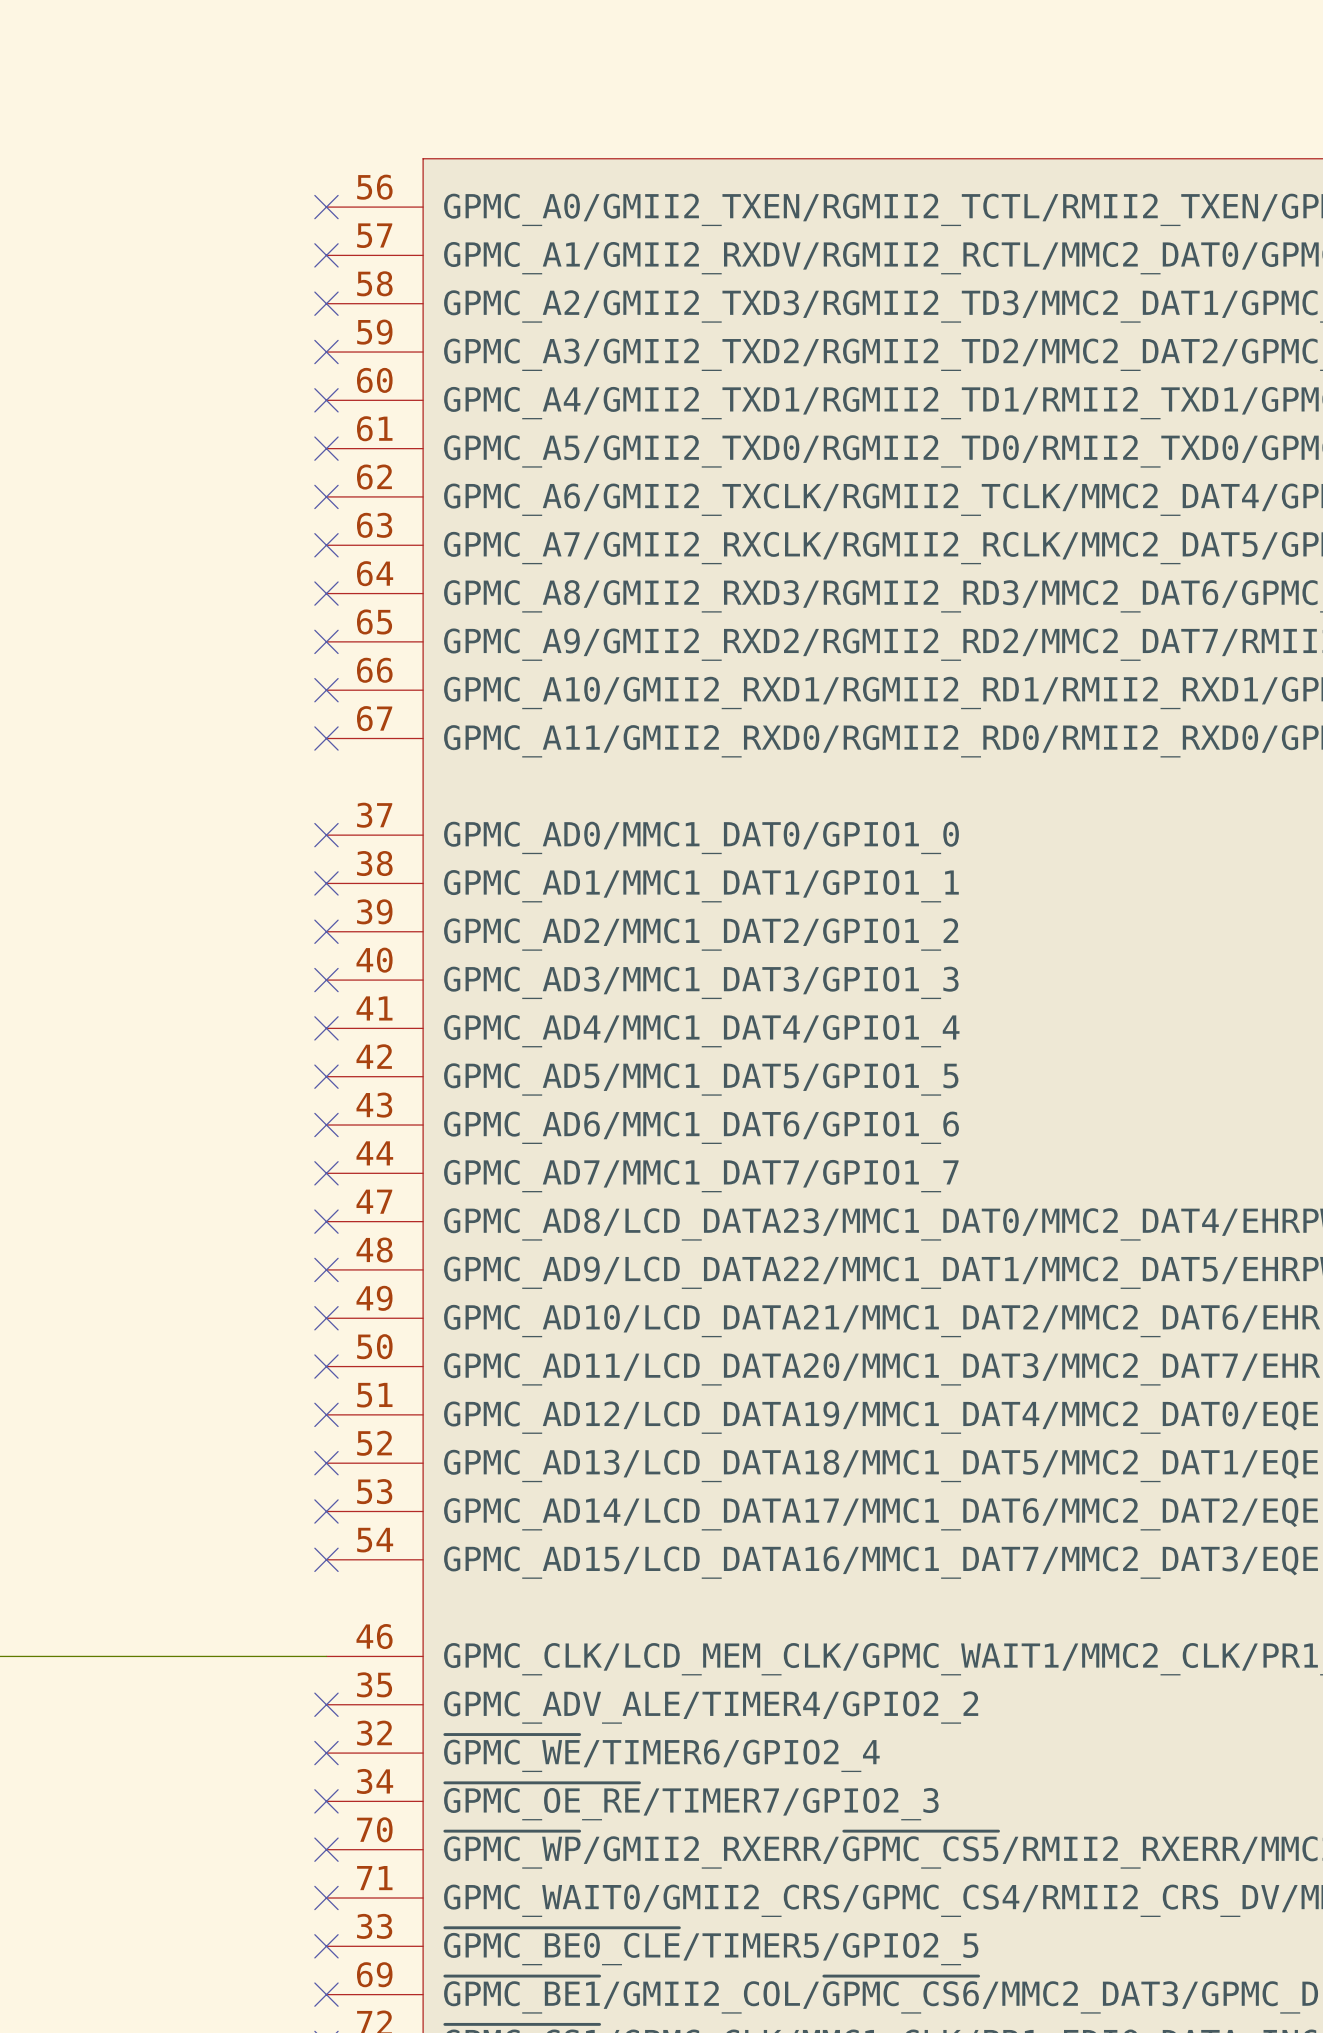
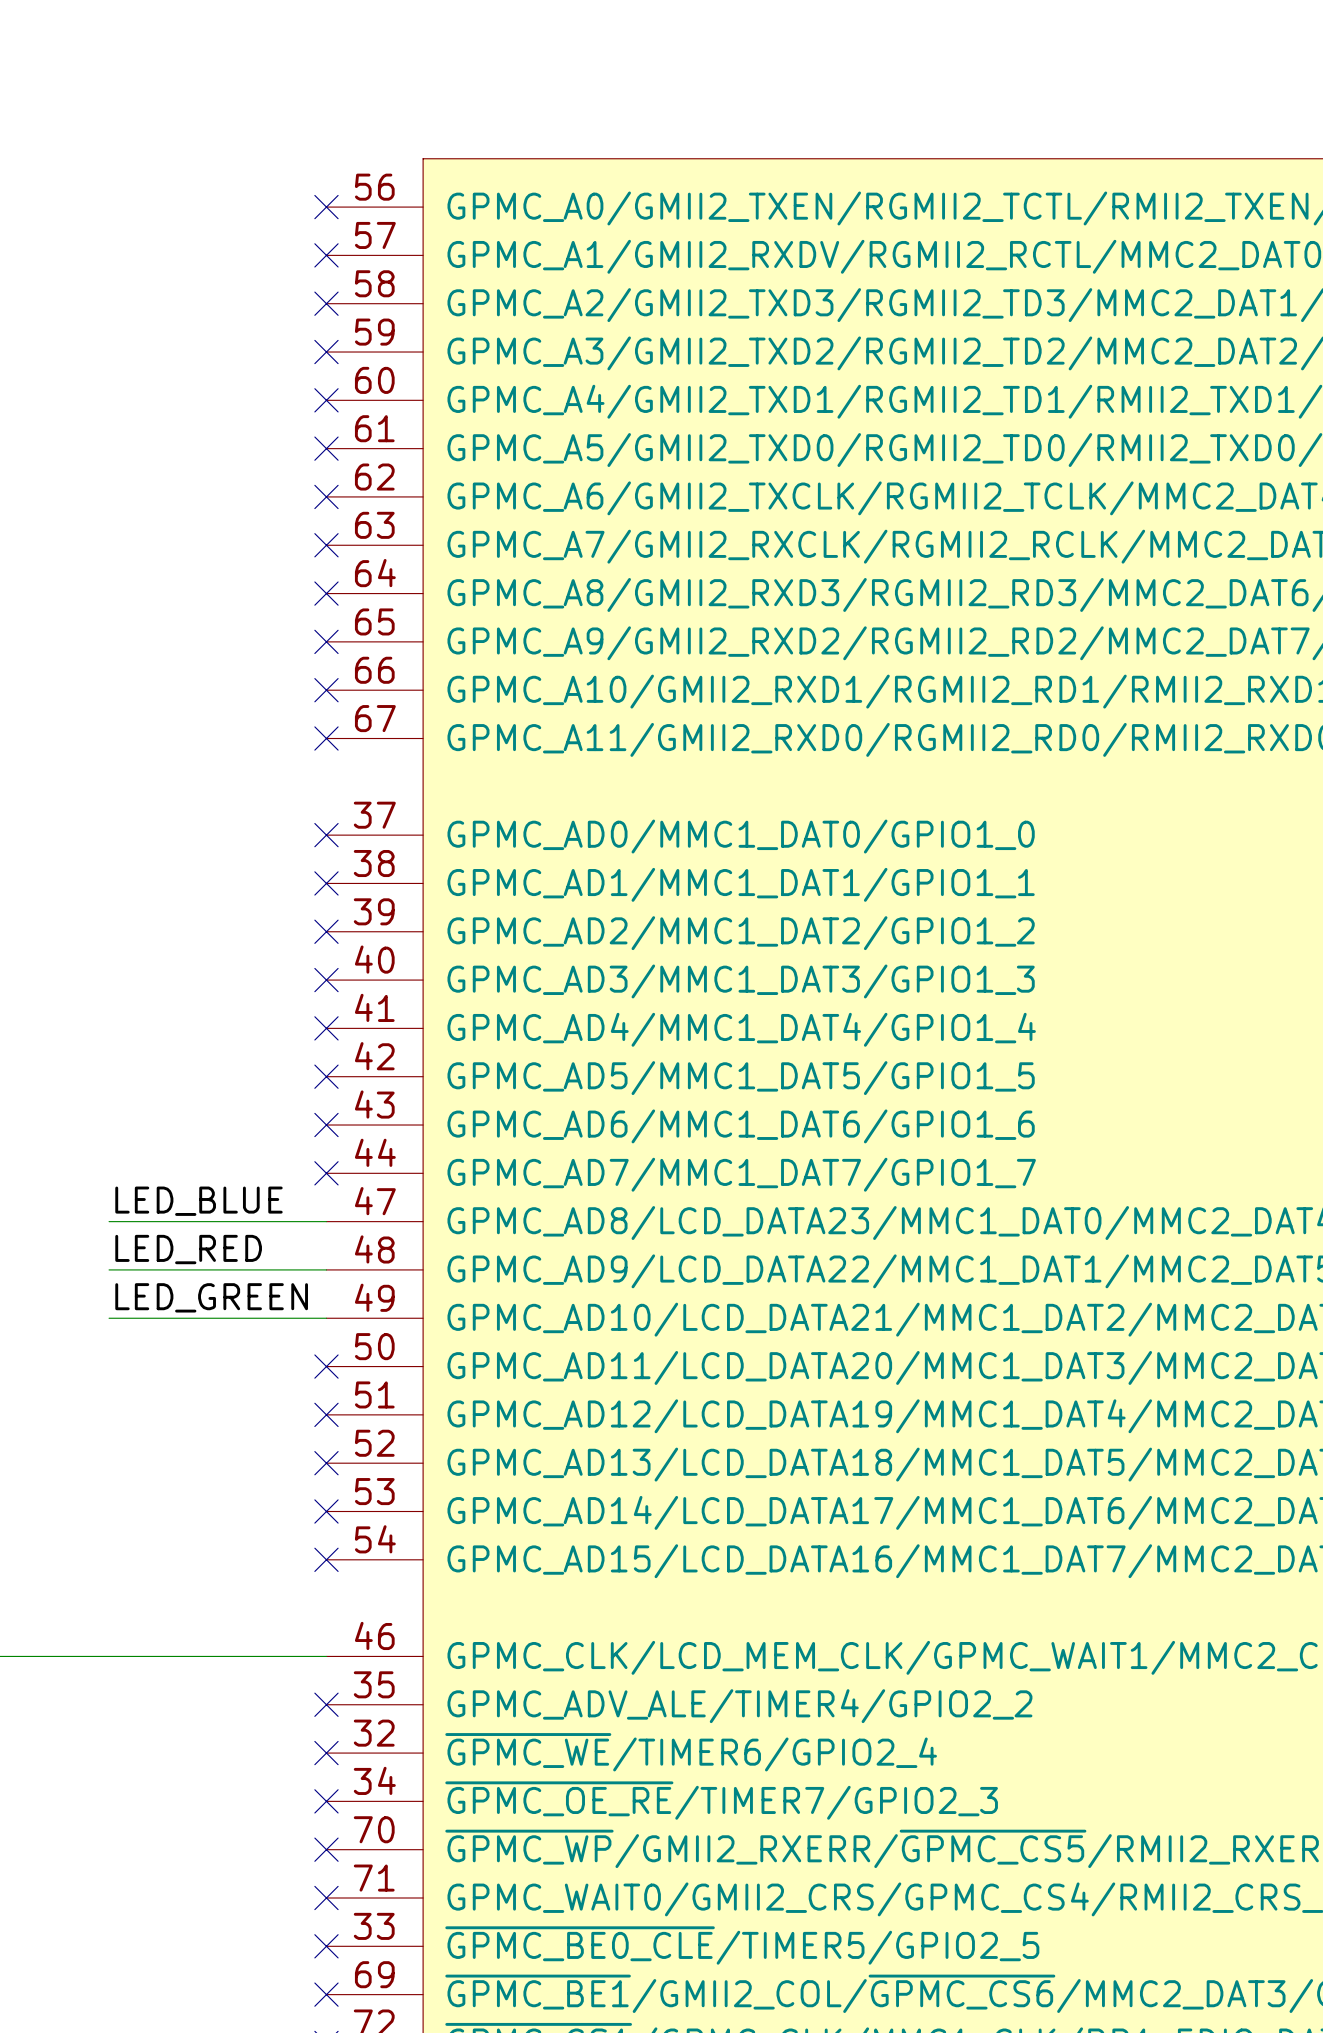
label: none -> LED_BLUE (198, 1201)
wire: none -> (109, 1221) (326, 1221)
no-connect mark: (326, 1221) -> none
label: none -> LED_RED (188, 1249)
wire: none -> (109, 1269) (326, 1269)
no-connect mark: (326, 1269) -> none
label: none -> LED_GREEN (211, 1297)
wire: none -> (109, 1318) (326, 1318)
no-connect mark: (326, 1318) -> none

